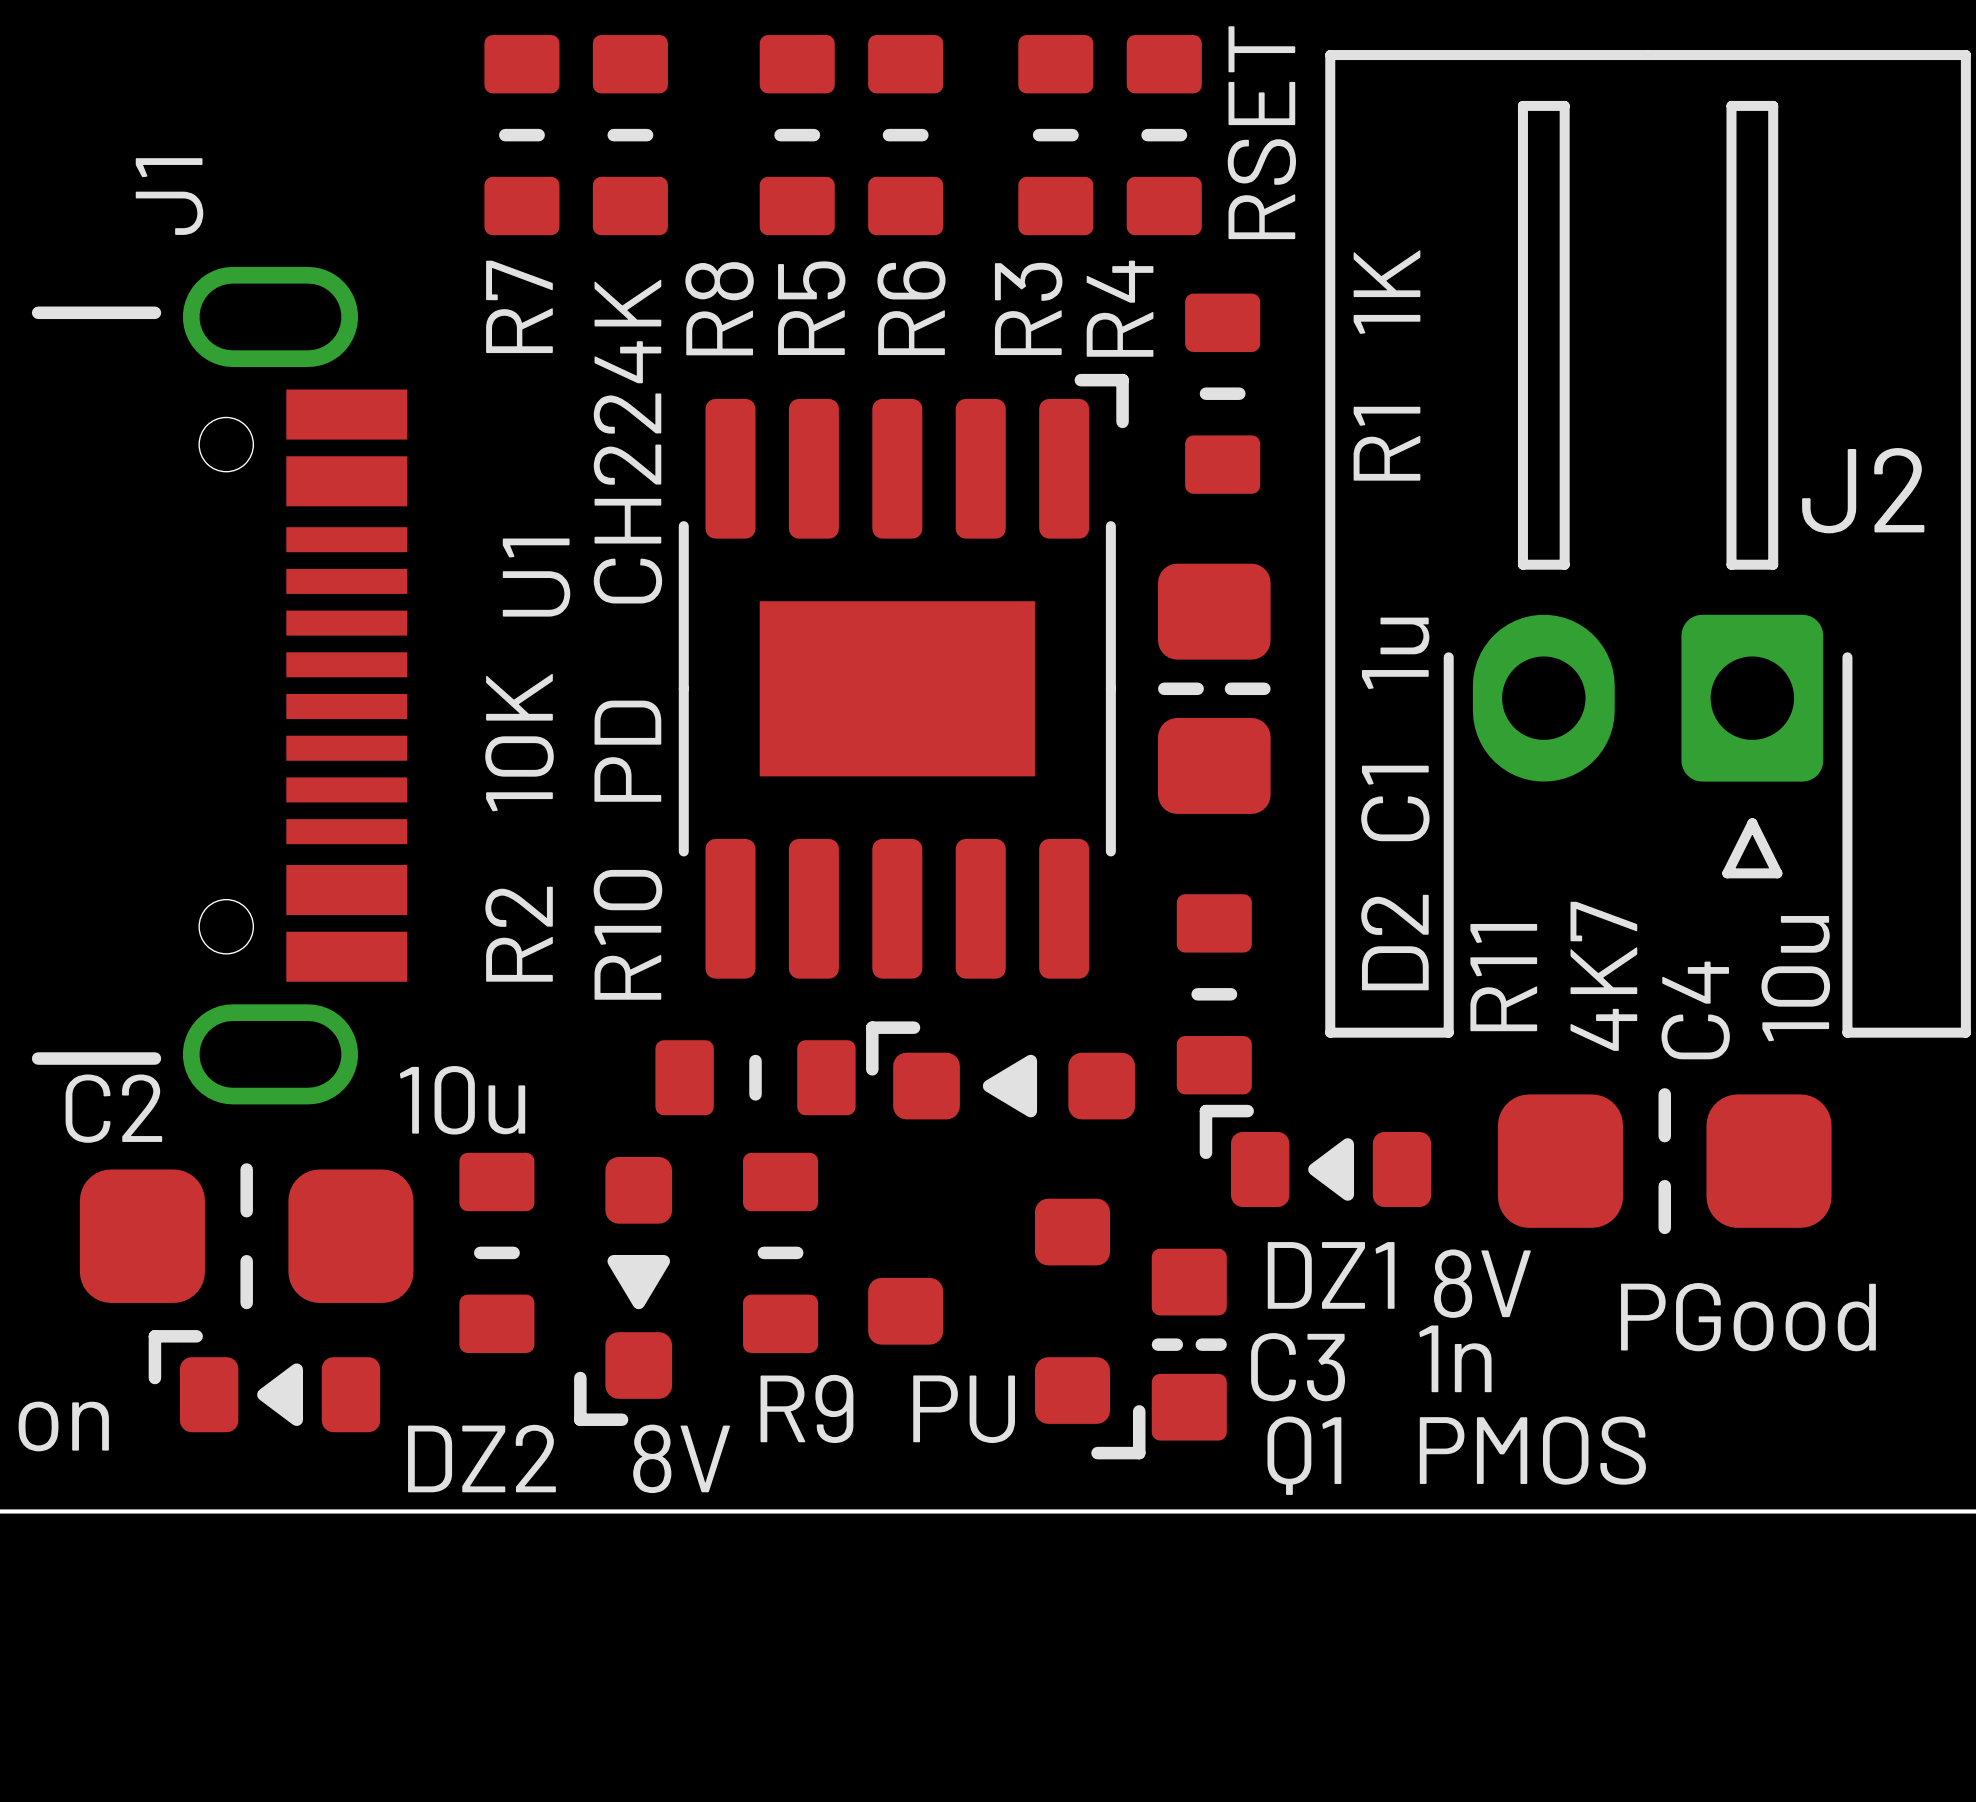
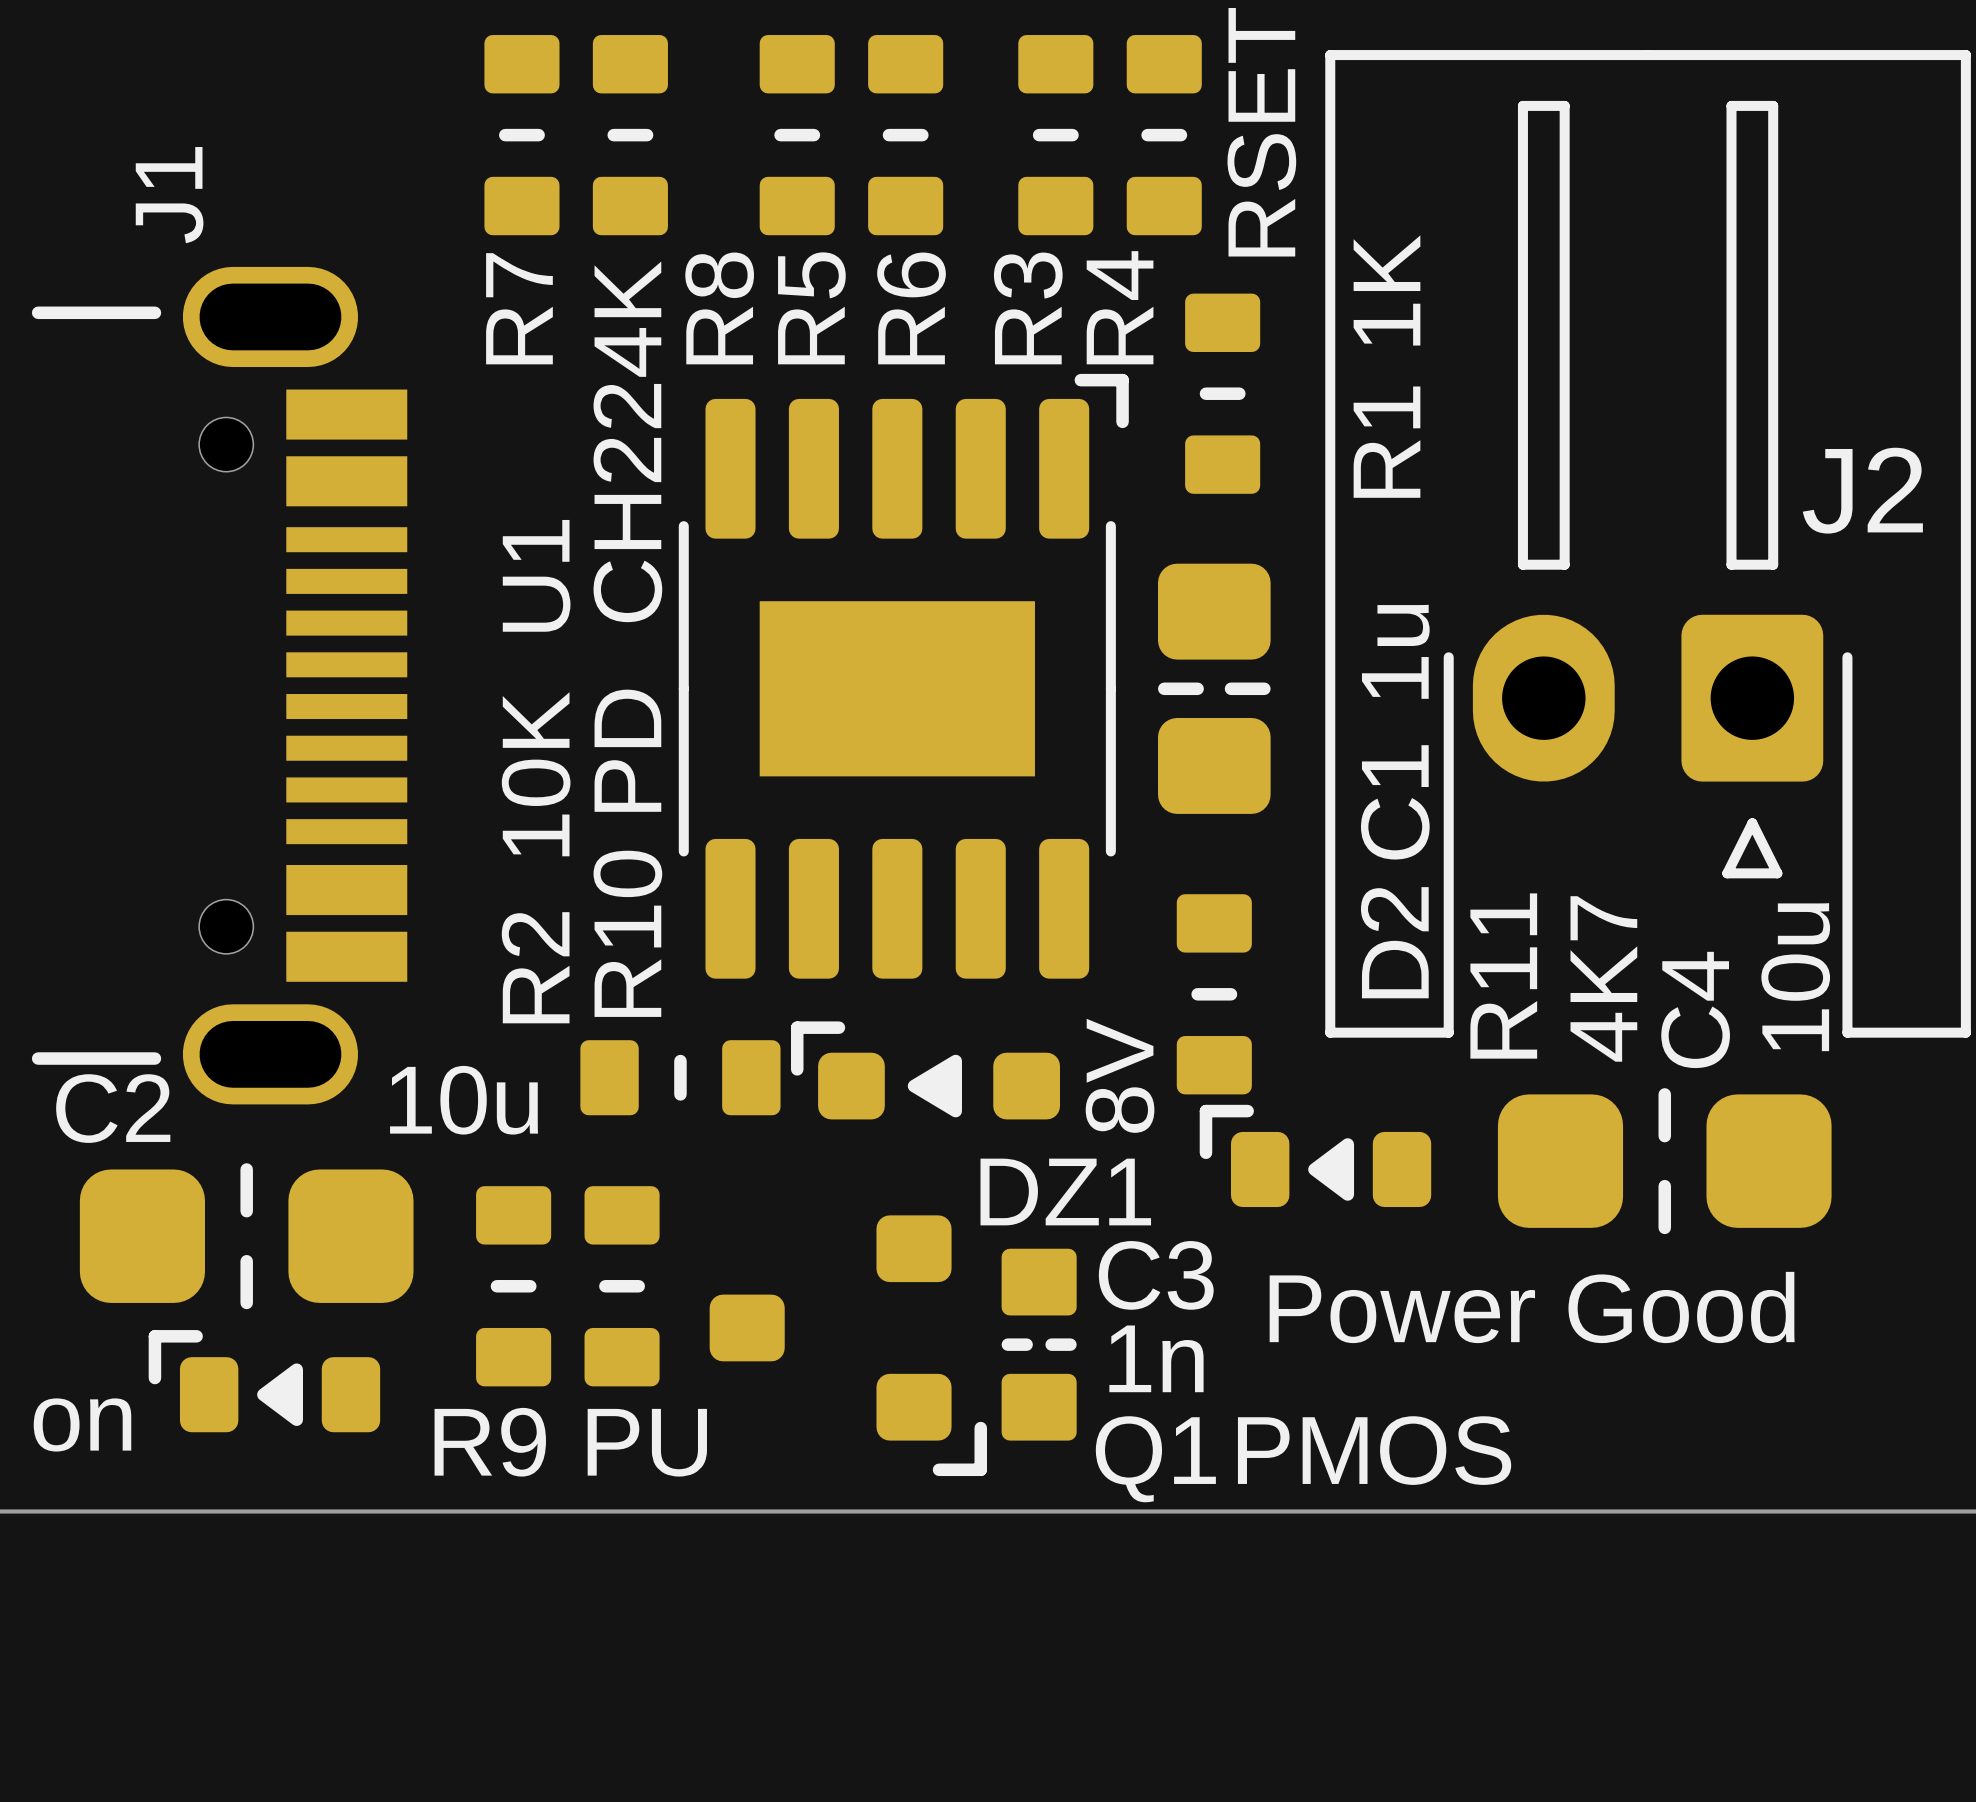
DZ1 position: (1000, 1070) -> (925, 1070)
R10 position: (755, 1077) -> (680, 1077)
R2 position: (496, 1252) -> (513, 1286)
R9 position: (780, 1252) -> (622, 1286)
DZ1 name position: DZ1 (1331, 1275) -> DZ1 (1065, 1192)
DZ1 value rotation: 0° (1482, 1283) -> 90° counterclockwise (1120, 1075)
DZ1 value position: 8V (1482, 1283) -> 8V (1120, 1075)
DZ2: 8V (623, 1291) -> none
D2 value: PGood (1748, 1317) -> Power Good (1532, 1307)
Q1 position: (1006, 1329) -> (848, 1345)
C3 position: (1189, 1344) -> (1039, 1344)
C3 value position: 1n (1455, 1358) -> 1n (1156, 1358)
C3 name position: C3 (1298, 1367) -> C3 (1156, 1275)
R9 name position: R9 (806, 1408) -> R9 (490, 1442)
R9 value position: PU (964, 1409) -> PU (647, 1442)
Q1 value position: PMOS (1532, 1450) -> PMOS (1374, 1450)
Q1 name position: Q1 (1304, 1455) -> Q1 (1155, 1459)

